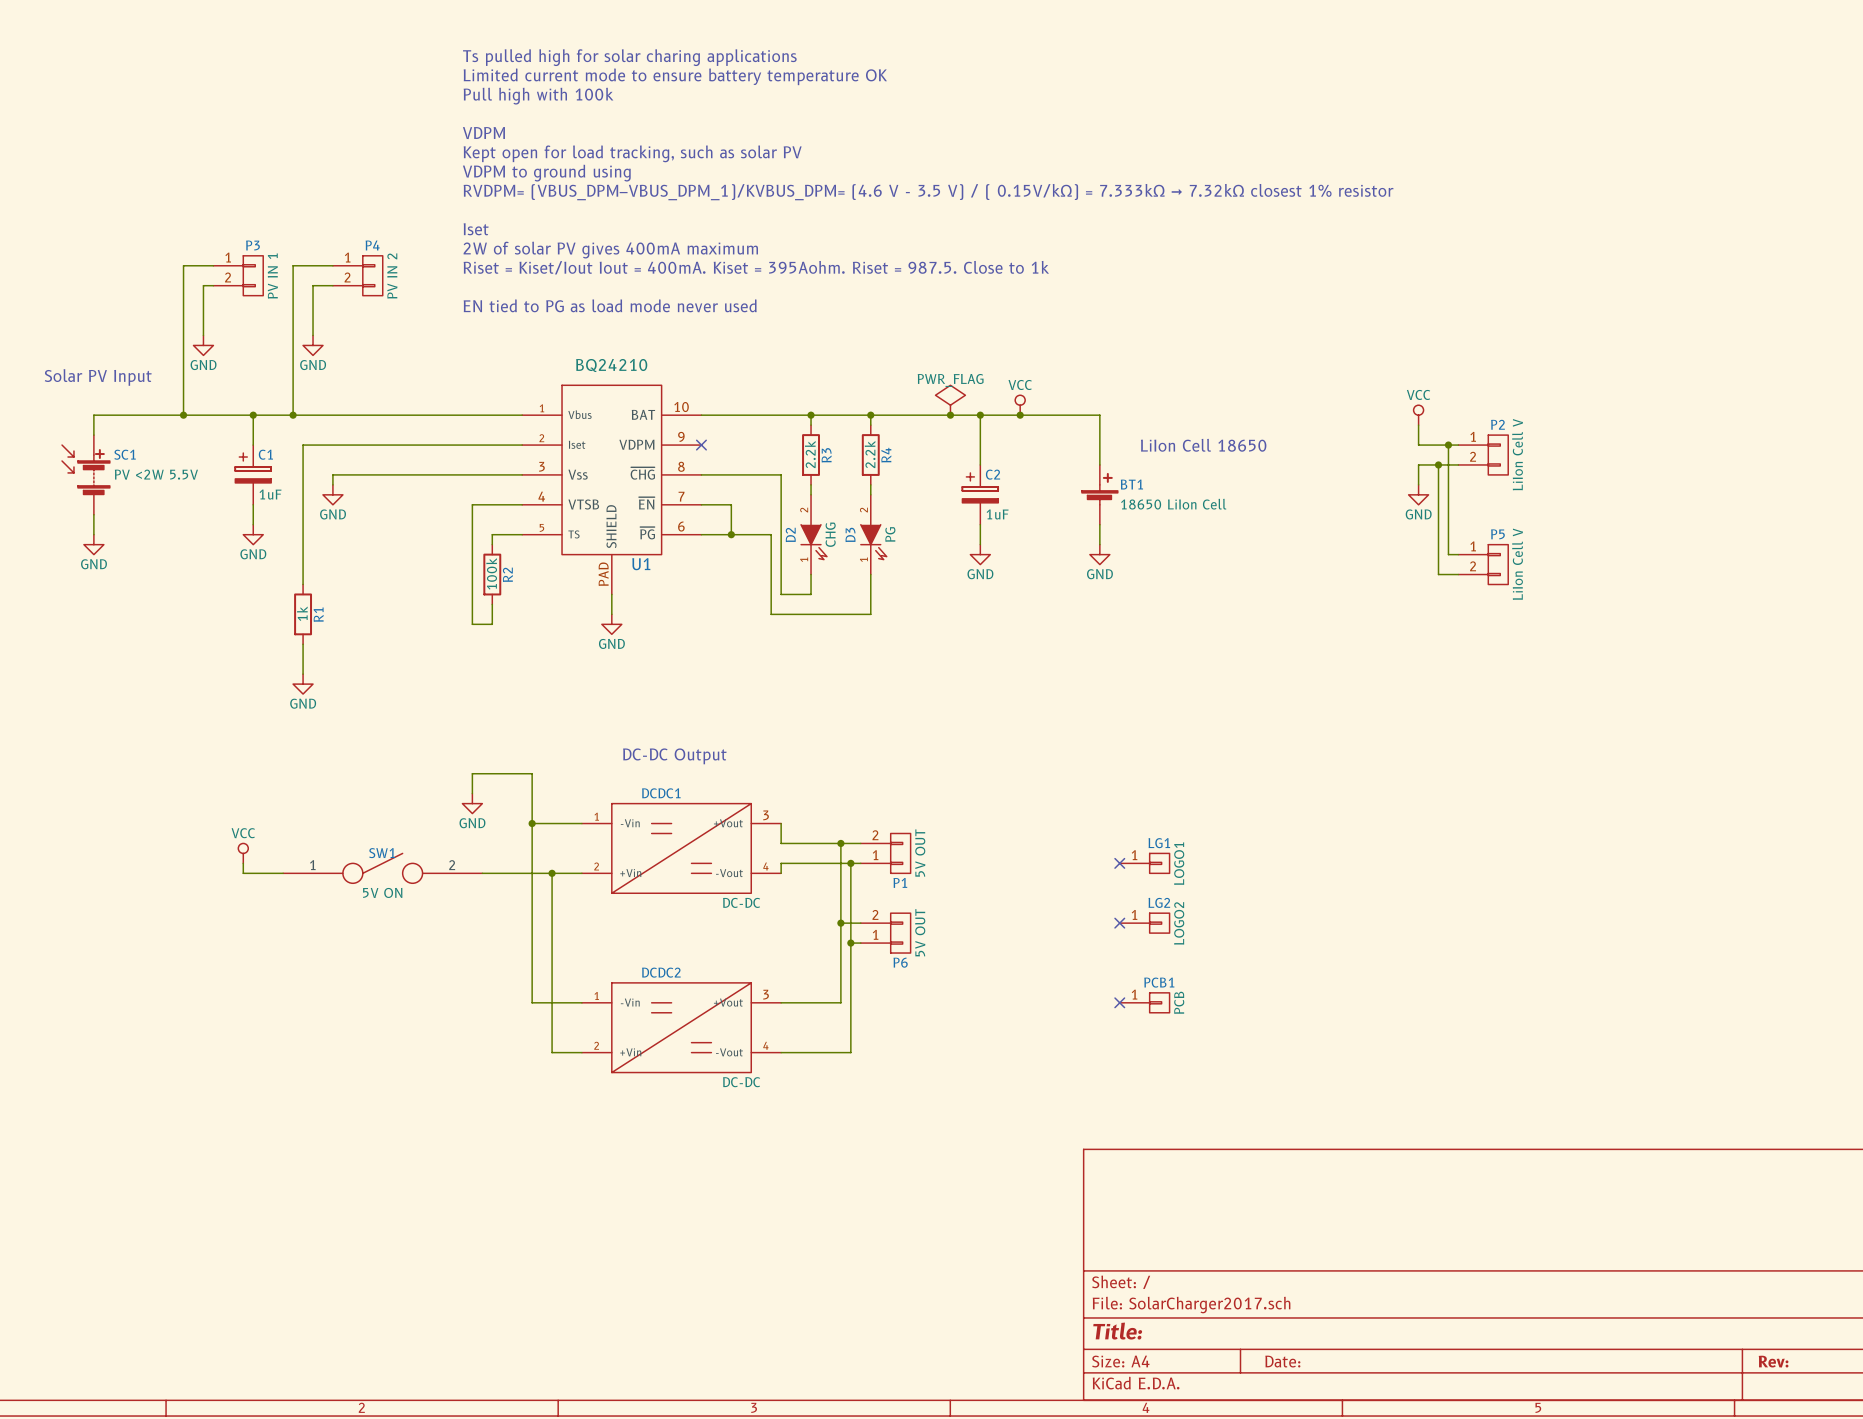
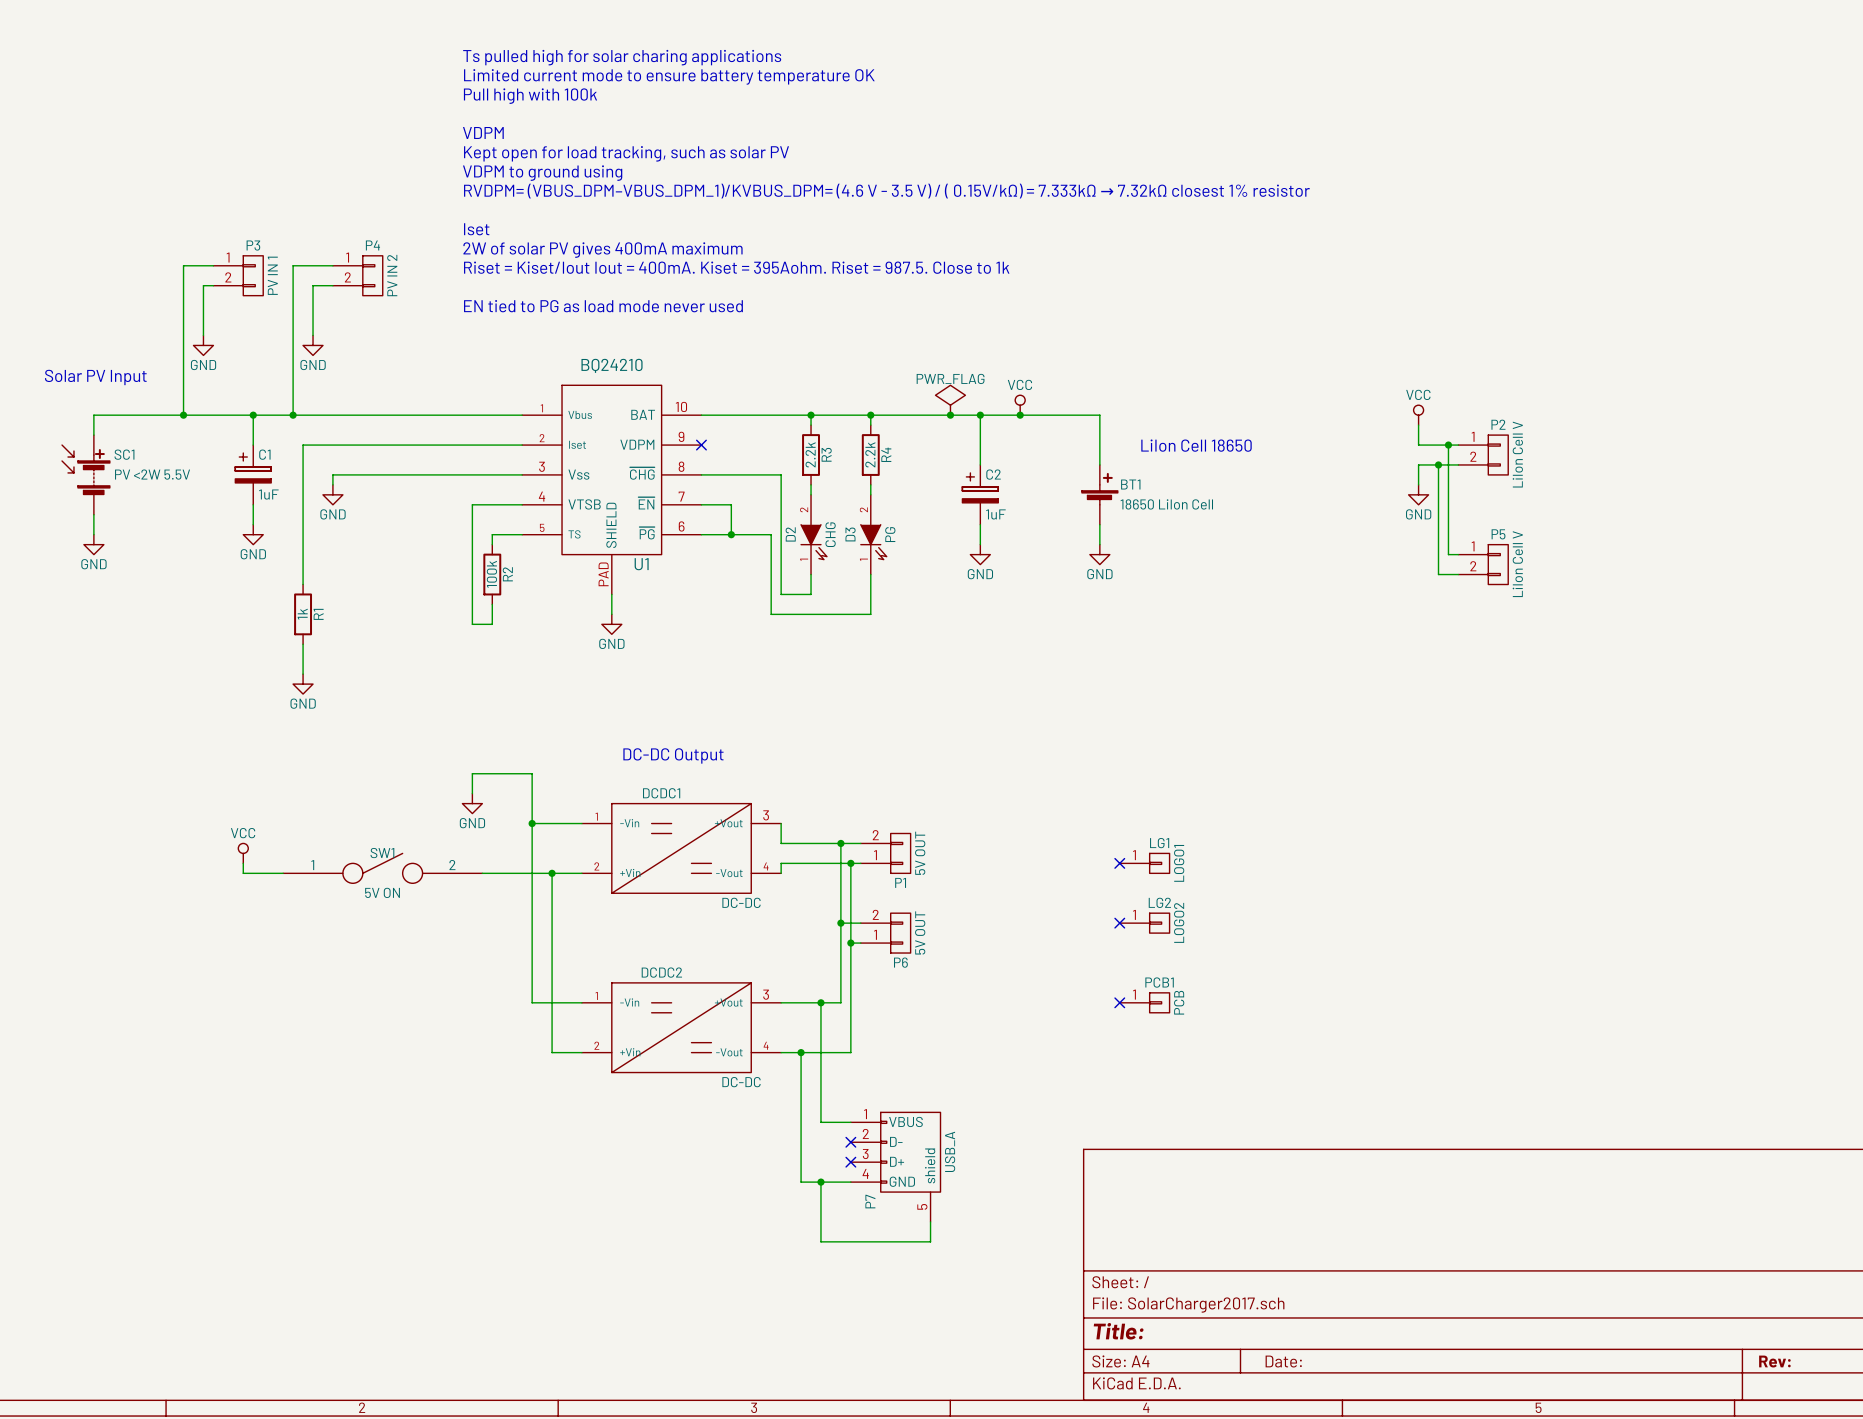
wire: none -> (820, 1002) (820, 1122) (850, 1122)
junction: none -> (820, 1002)
wire: none -> (801, 1052) (801, 1182) (850, 1182)
junction: none -> (801, 1052)
no-connect mark: none -> (850, 1142)
no-connect mark: none -> (850, 1162)
P7: none -> USB_A (895, 1167)
wire: none -> (820, 1182) (820, 1241) (930, 1241) (930, 1221)
junction: none -> (820, 1182)

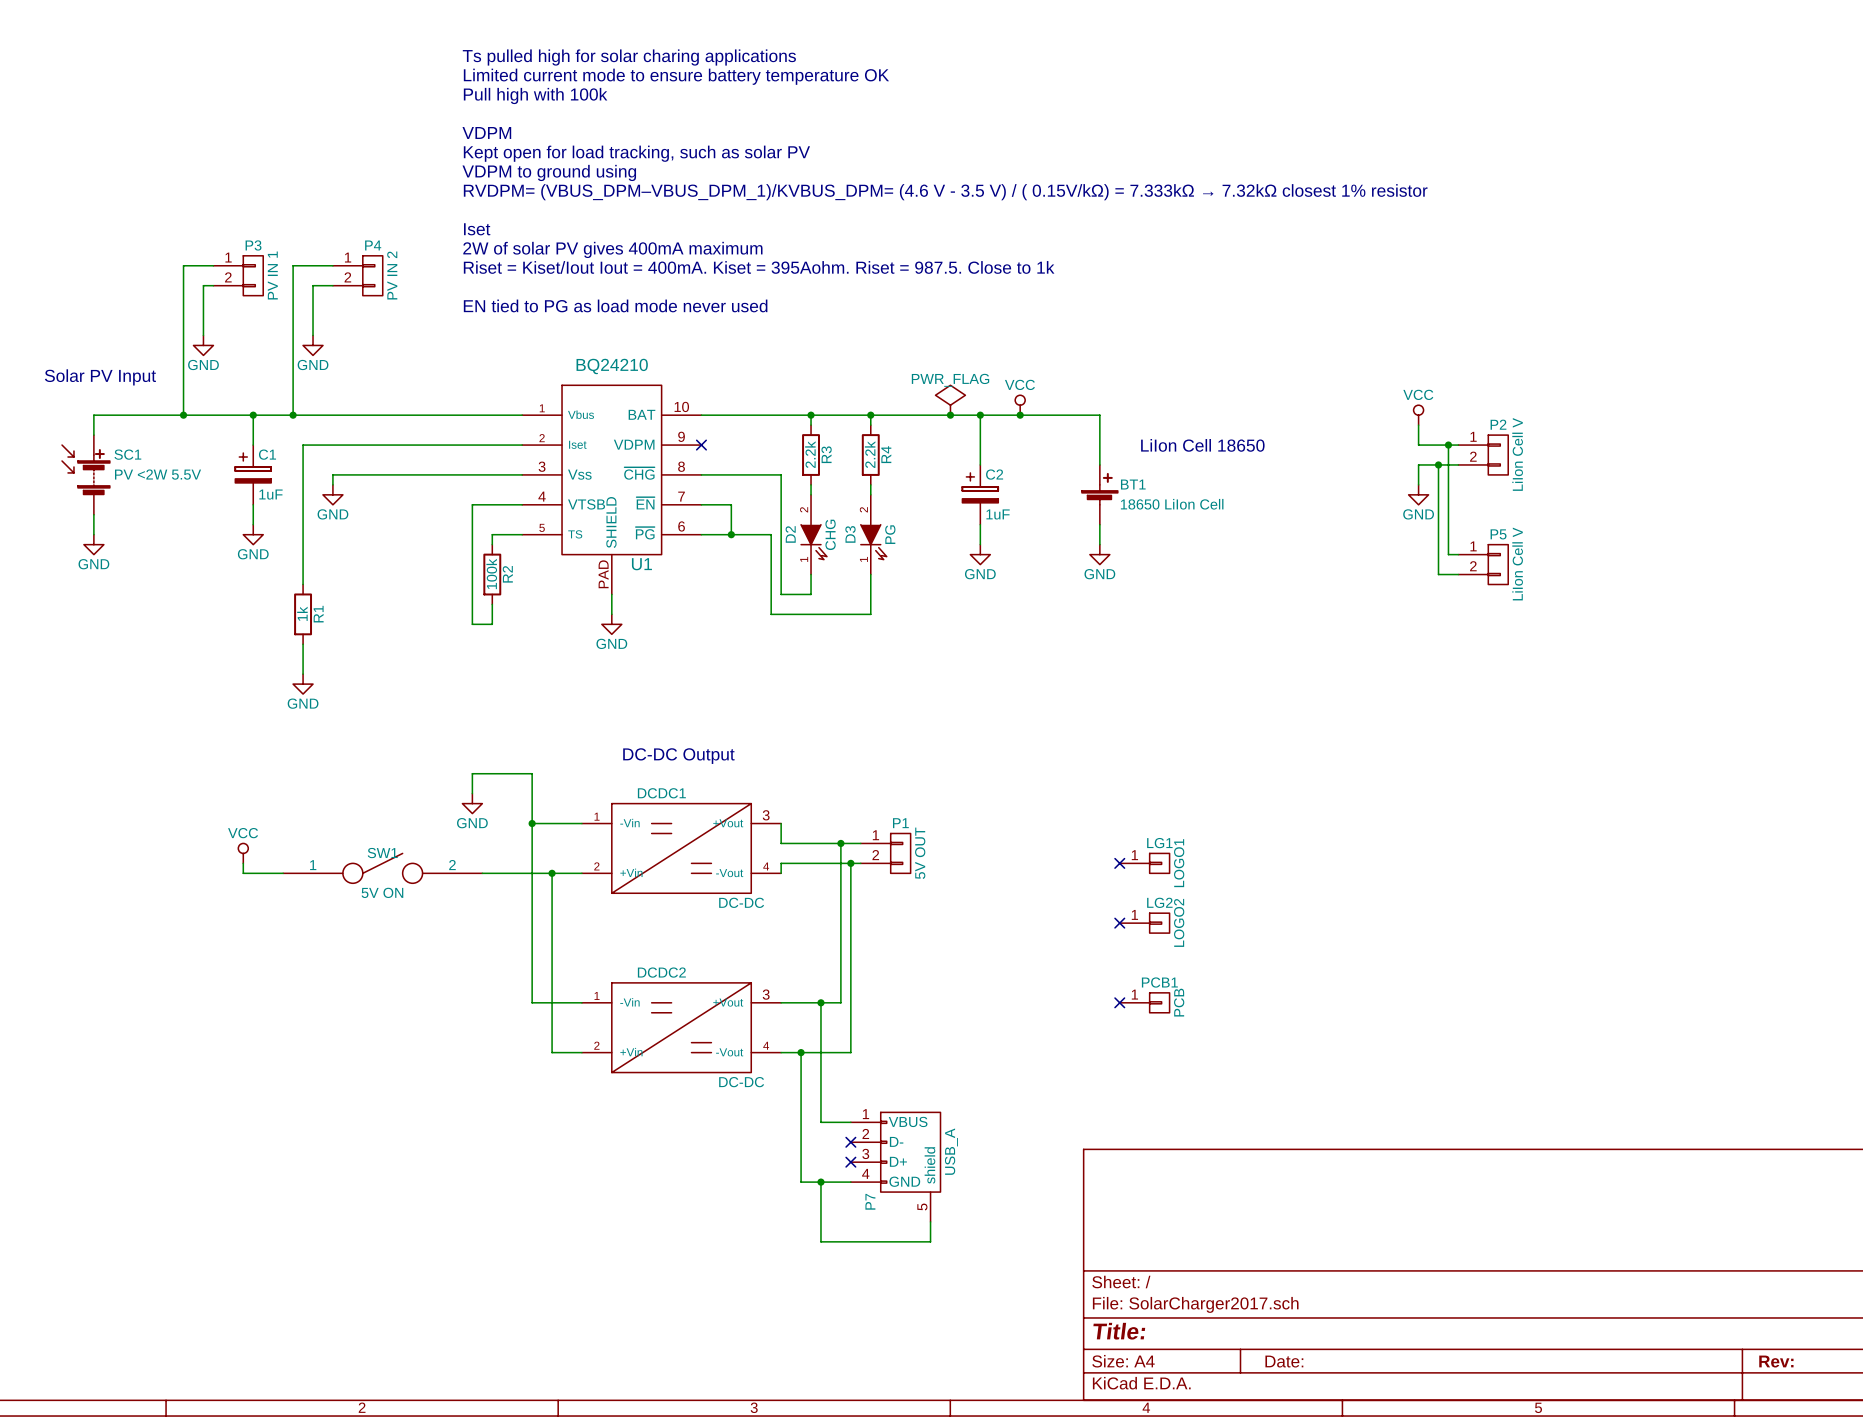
P1 flip: as is (900, 853) -> up-down (900, 853)
wire: (840, 923) (860, 923) -> none
junction: (840, 923) -> none
P6: 5V OUT (885, 933) -> none
wire: (850, 943) (860, 943) -> none
junction: (850, 943) -> none

